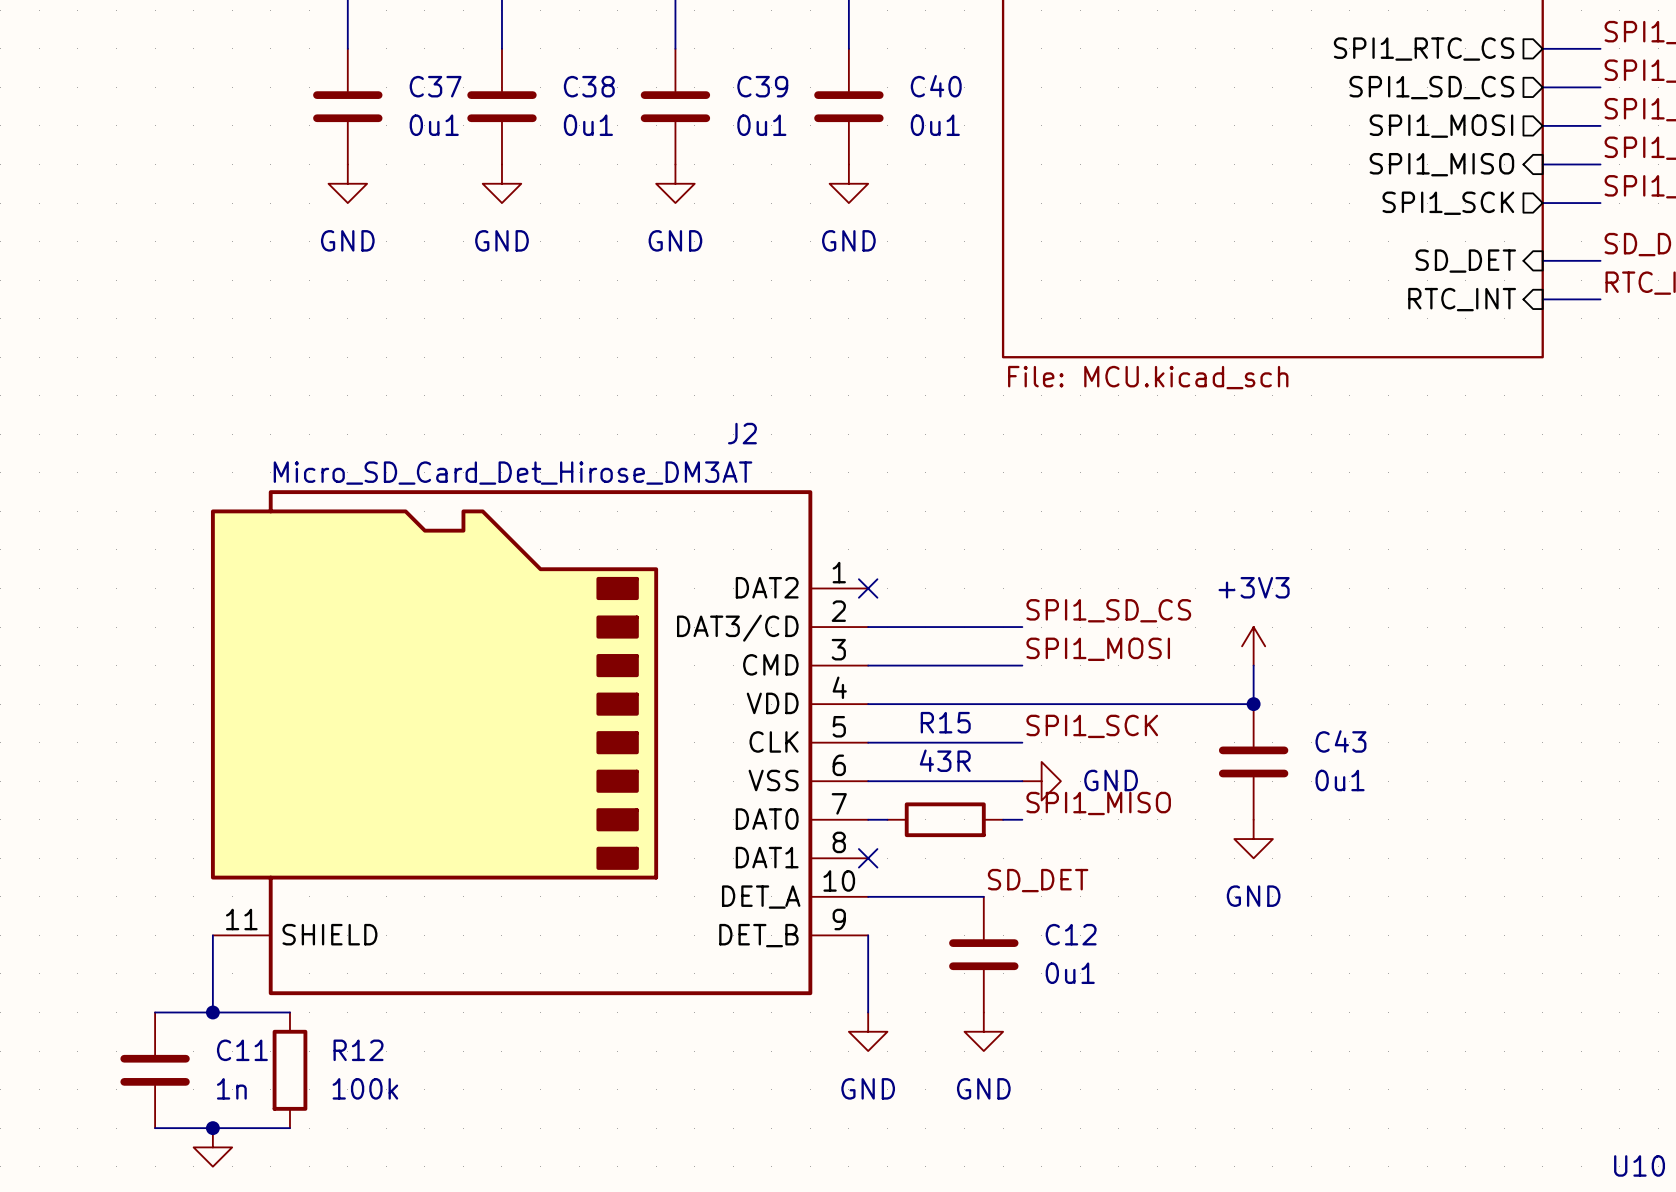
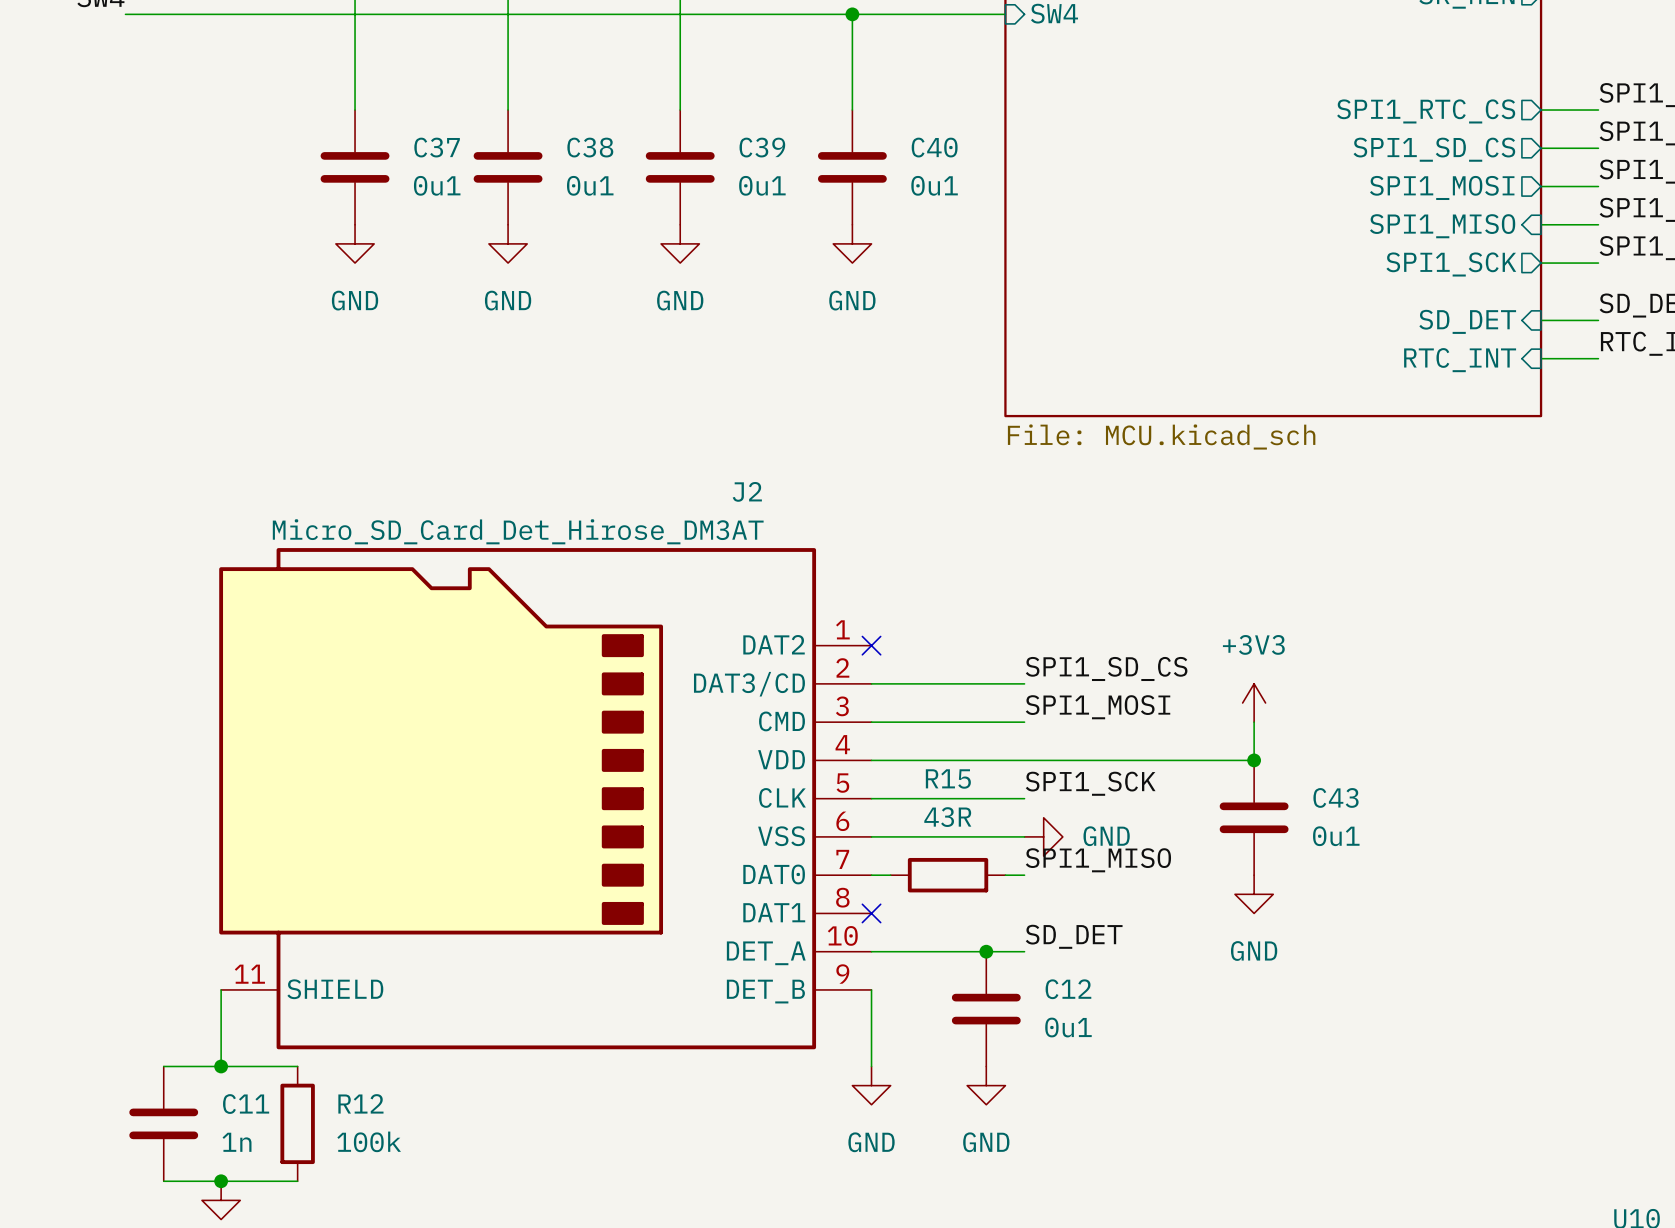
label position: SD_DET (1038, 880) -> SD_DET (1074, 936)
wire: none -> (986, 951) (1024, 951)
junction: none -> (986, 951)

